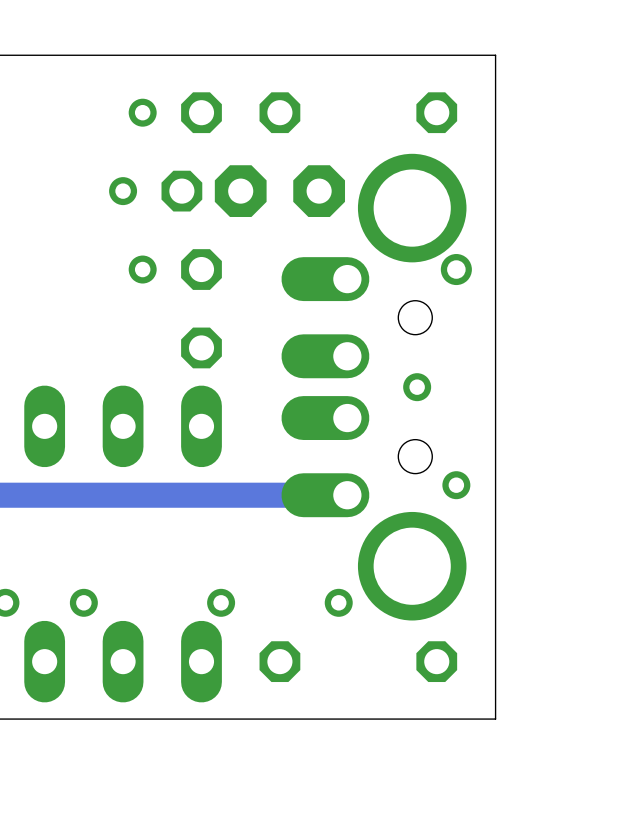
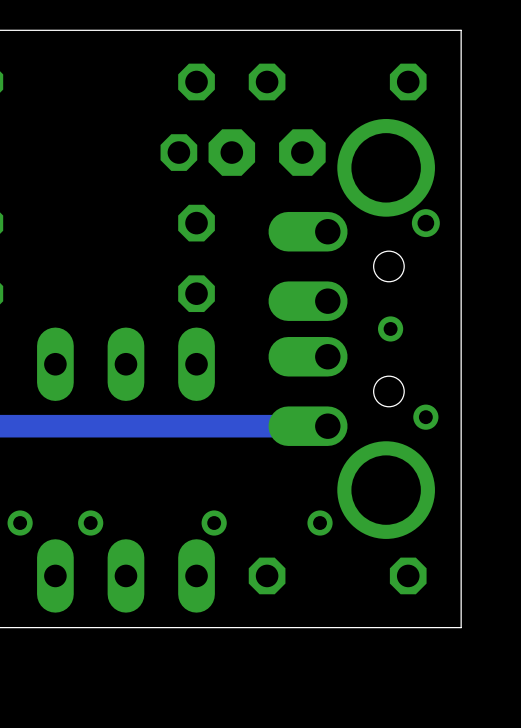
via: (142, 112) -> none
via: (123, 191) -> none
via: (142, 269) -> none

